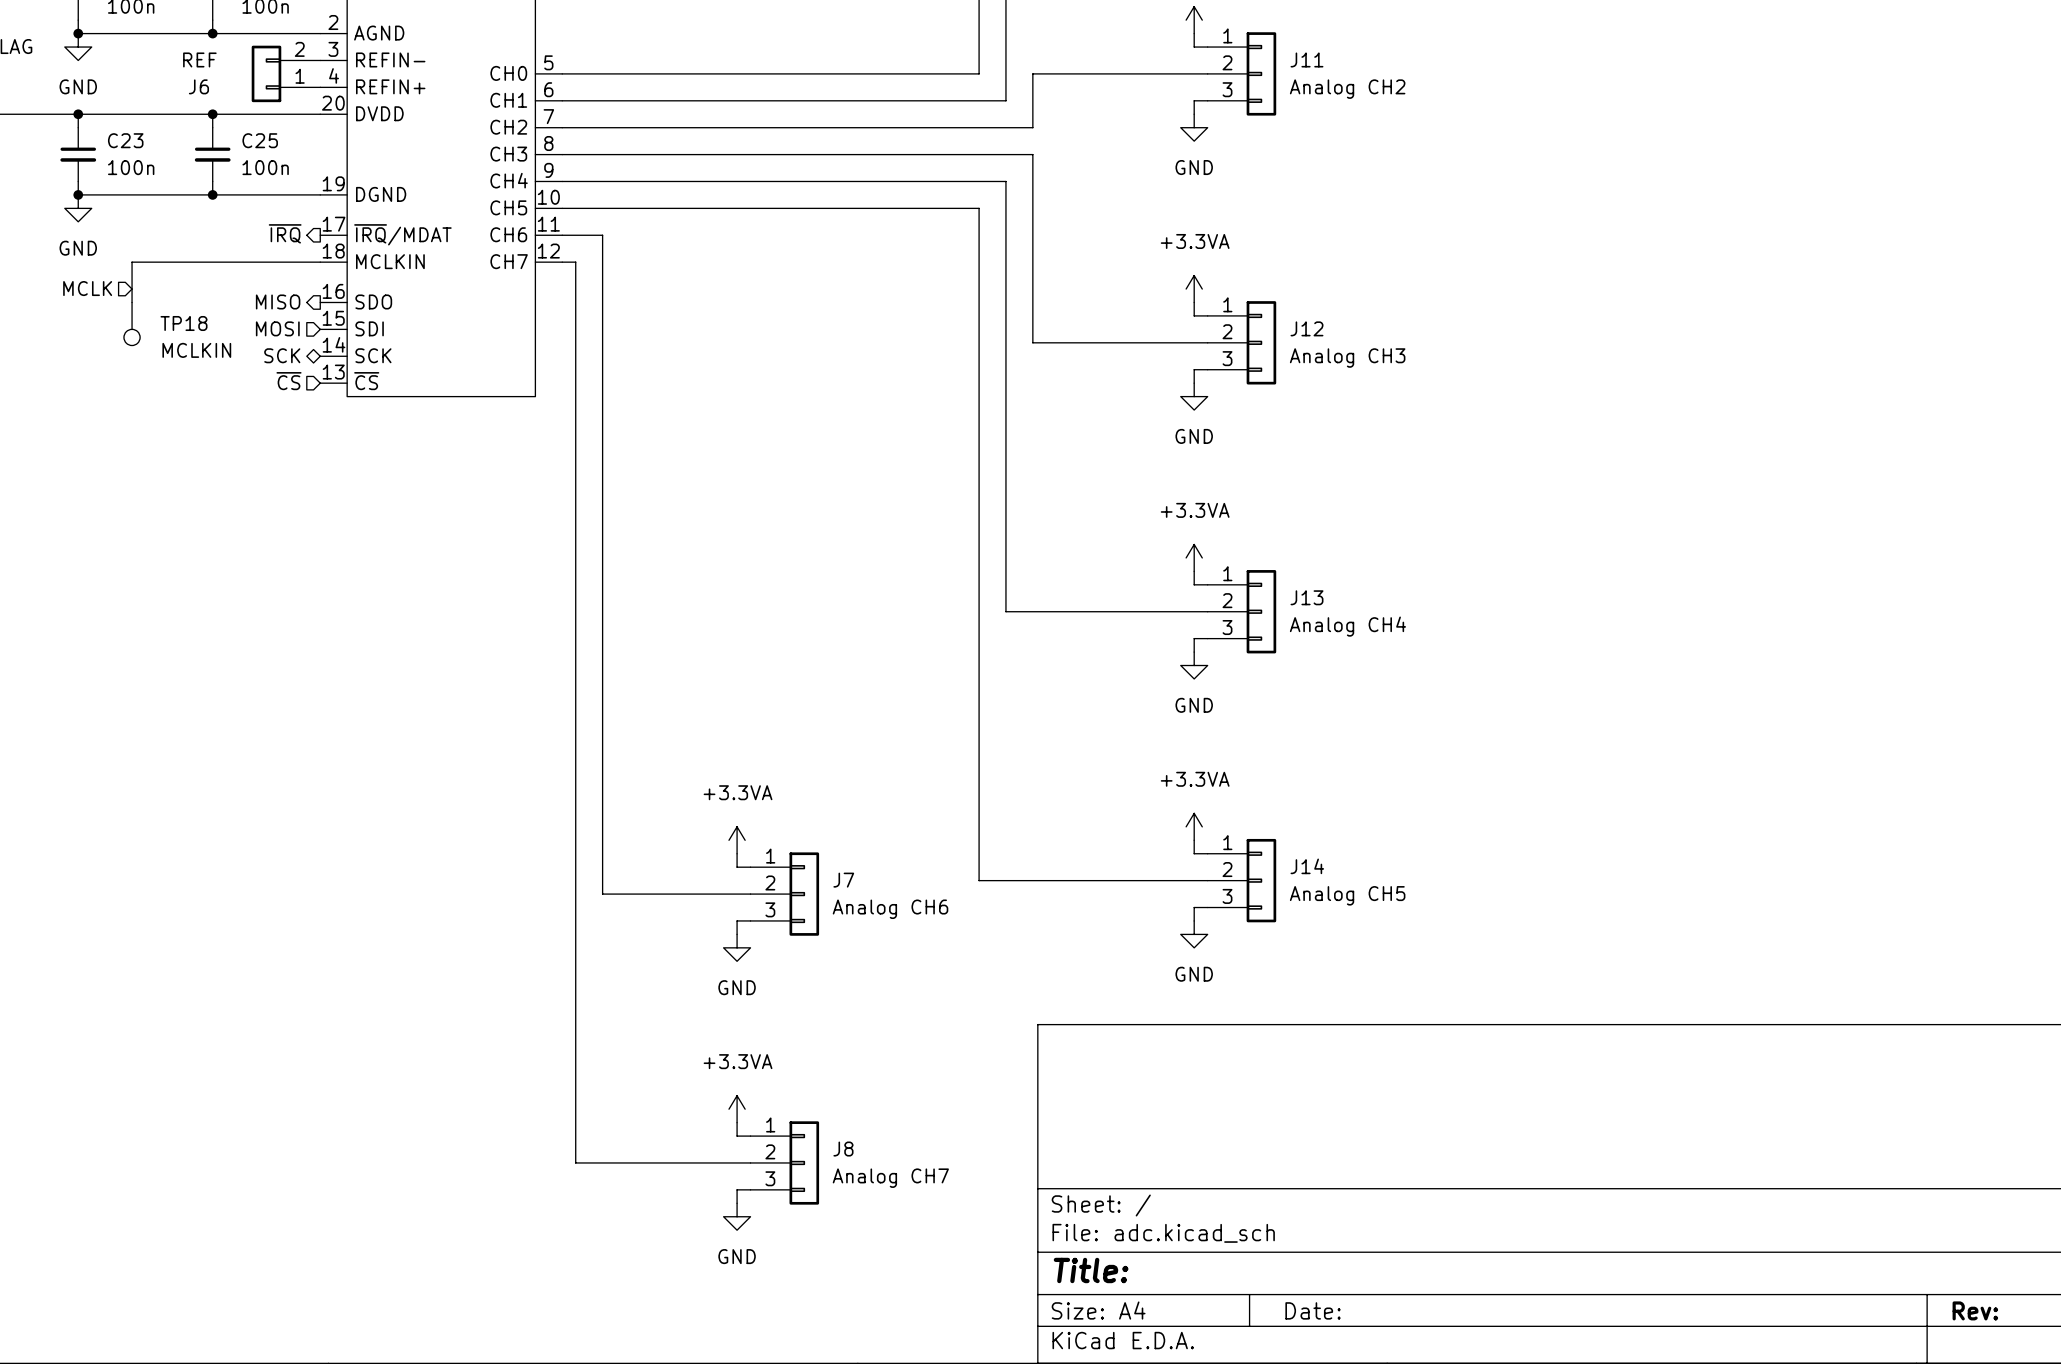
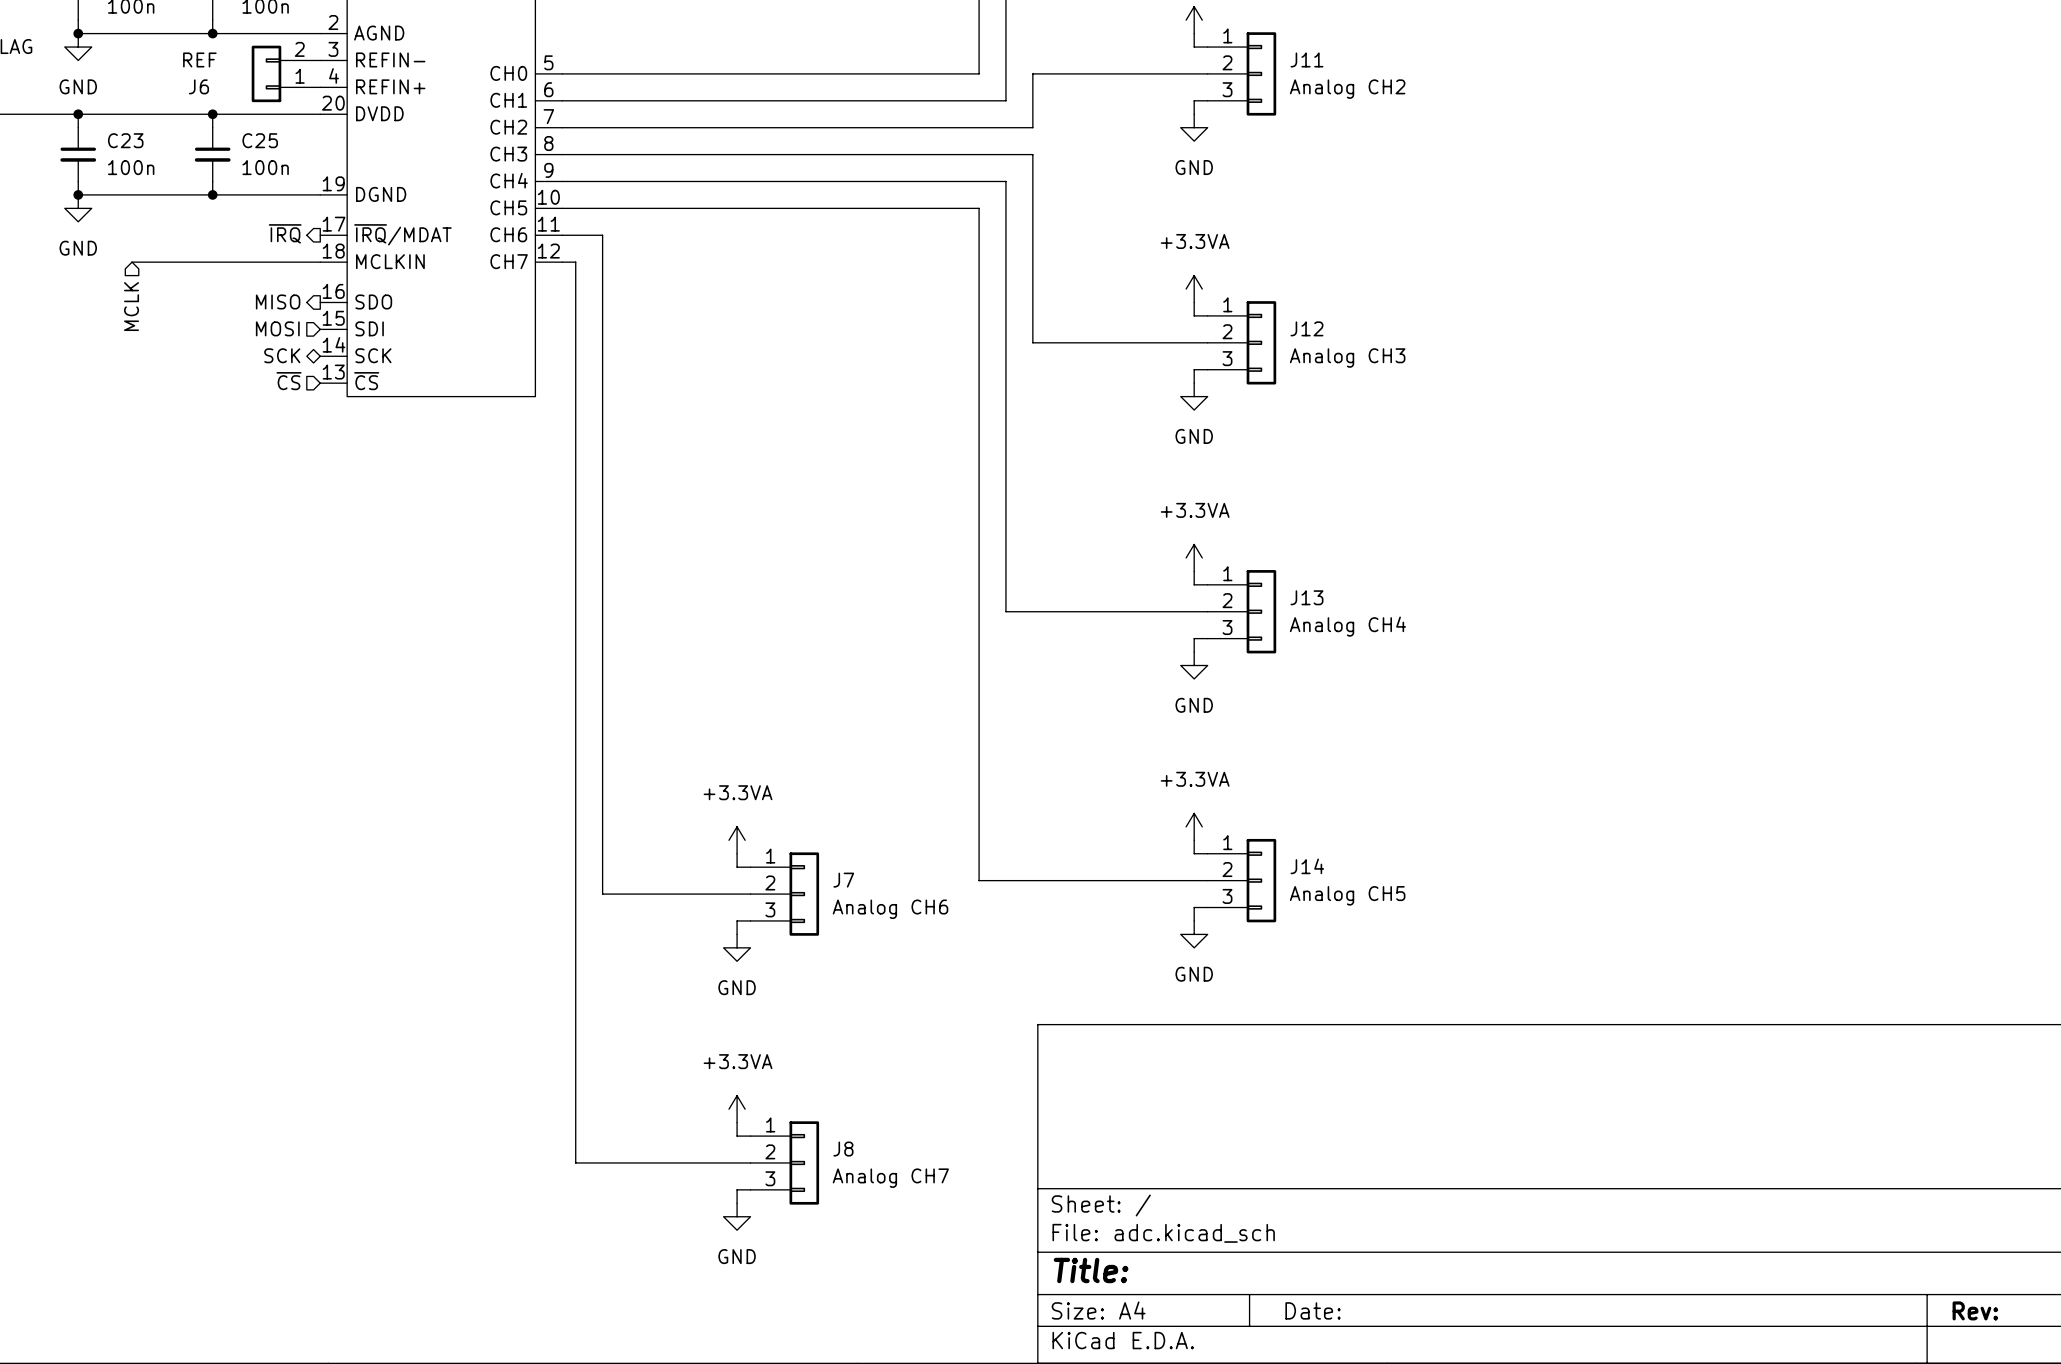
wire: (132, 262) (132, 302) -> none
hierarchical label rotation: 0° (87, 288) -> 90° counterclockwise (131, 306)
TP18: MCLKIN (132, 324) -> none

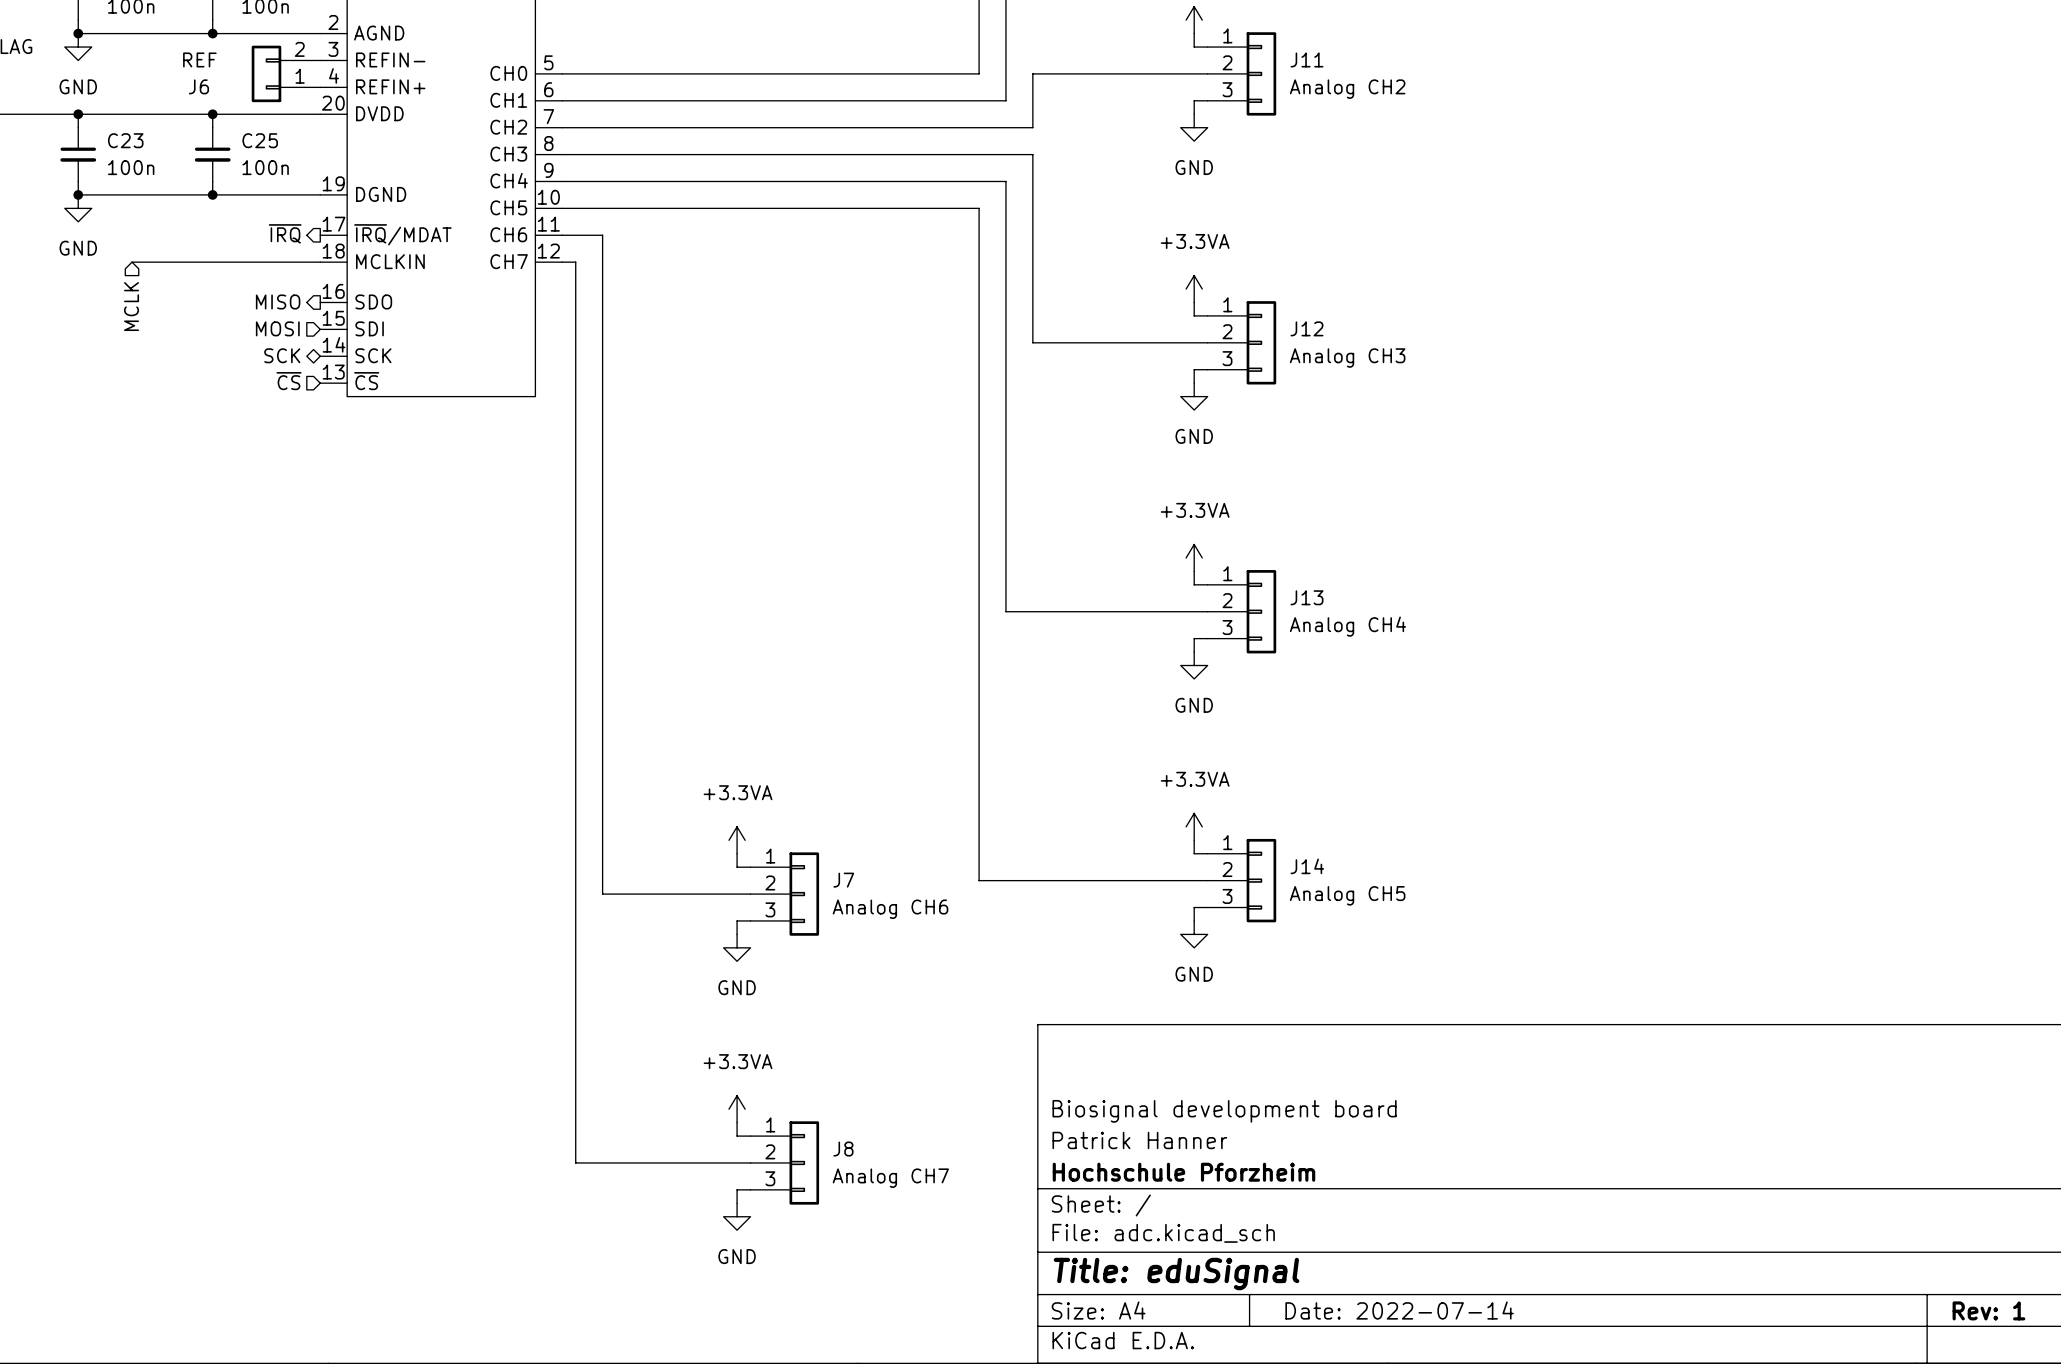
title block: none -> Biosignal development board (1224, 1111)
title block: none -> Patrick Hanner (1139, 1140)
title block: none -> Hochschule Pforzheim (1183, 1172)
title block: Title: (1091, 1270) -> Title: eduSignal (1176, 1274)
title block: Date: (1313, 1310) -> Date: 2022-07-14 (1399, 1310)
title block: Rev: (1975, 1310) -> Rev: 1 (1988, 1310)

